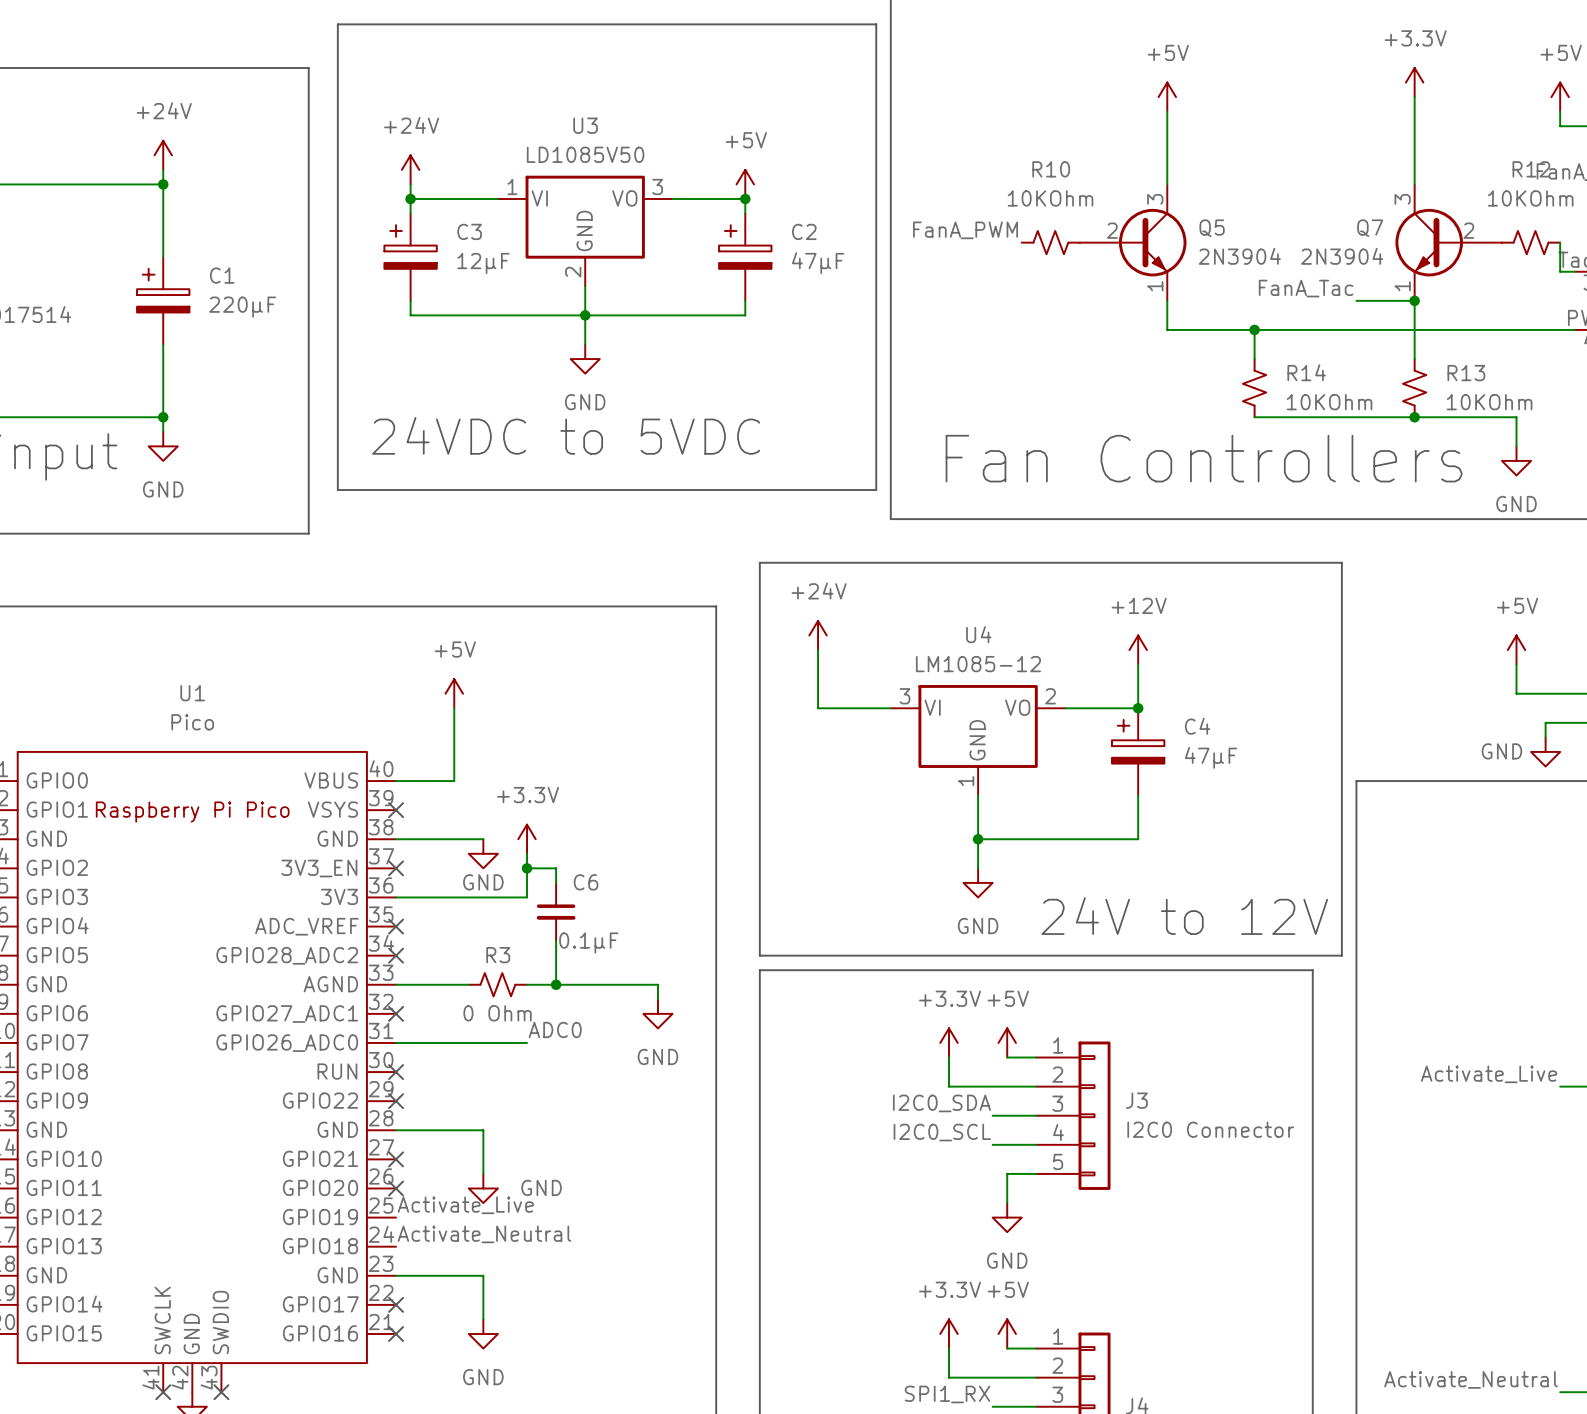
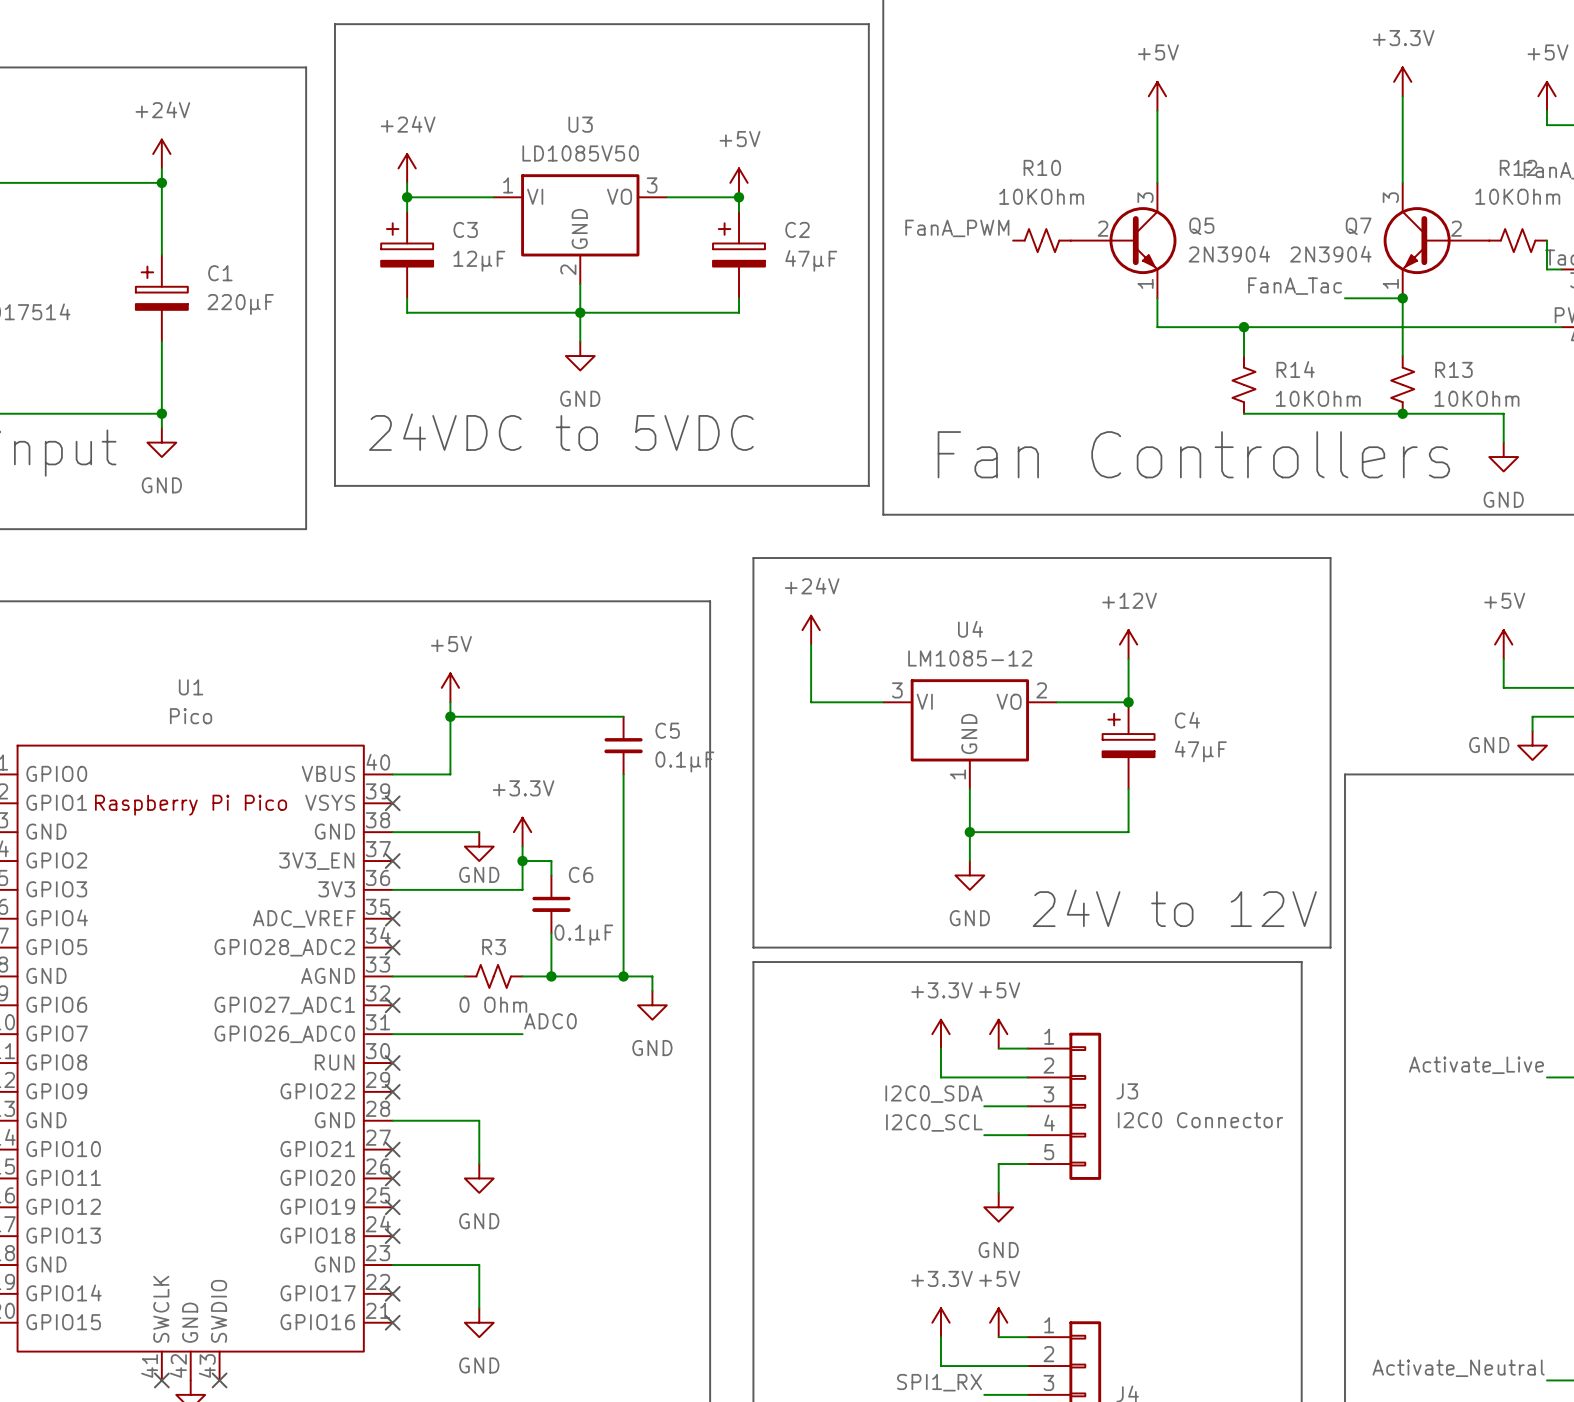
wire: none -> (450, 716) (623, 716)
junction: none -> (450, 716)
C5: none -> 0.1µF (623, 745)
wire: none -> (623, 774) (623, 976)
junction: none -> (623, 976)
power symbol text position: GND (541, 1187) -> GND (479, 1221)
label: Activate_Live (465, 1205) -> none
no-connect mark: none -> (392, 1207)
label: Activate_Neutral (484, 1234) -> none
no-connect mark: none -> (392, 1236)

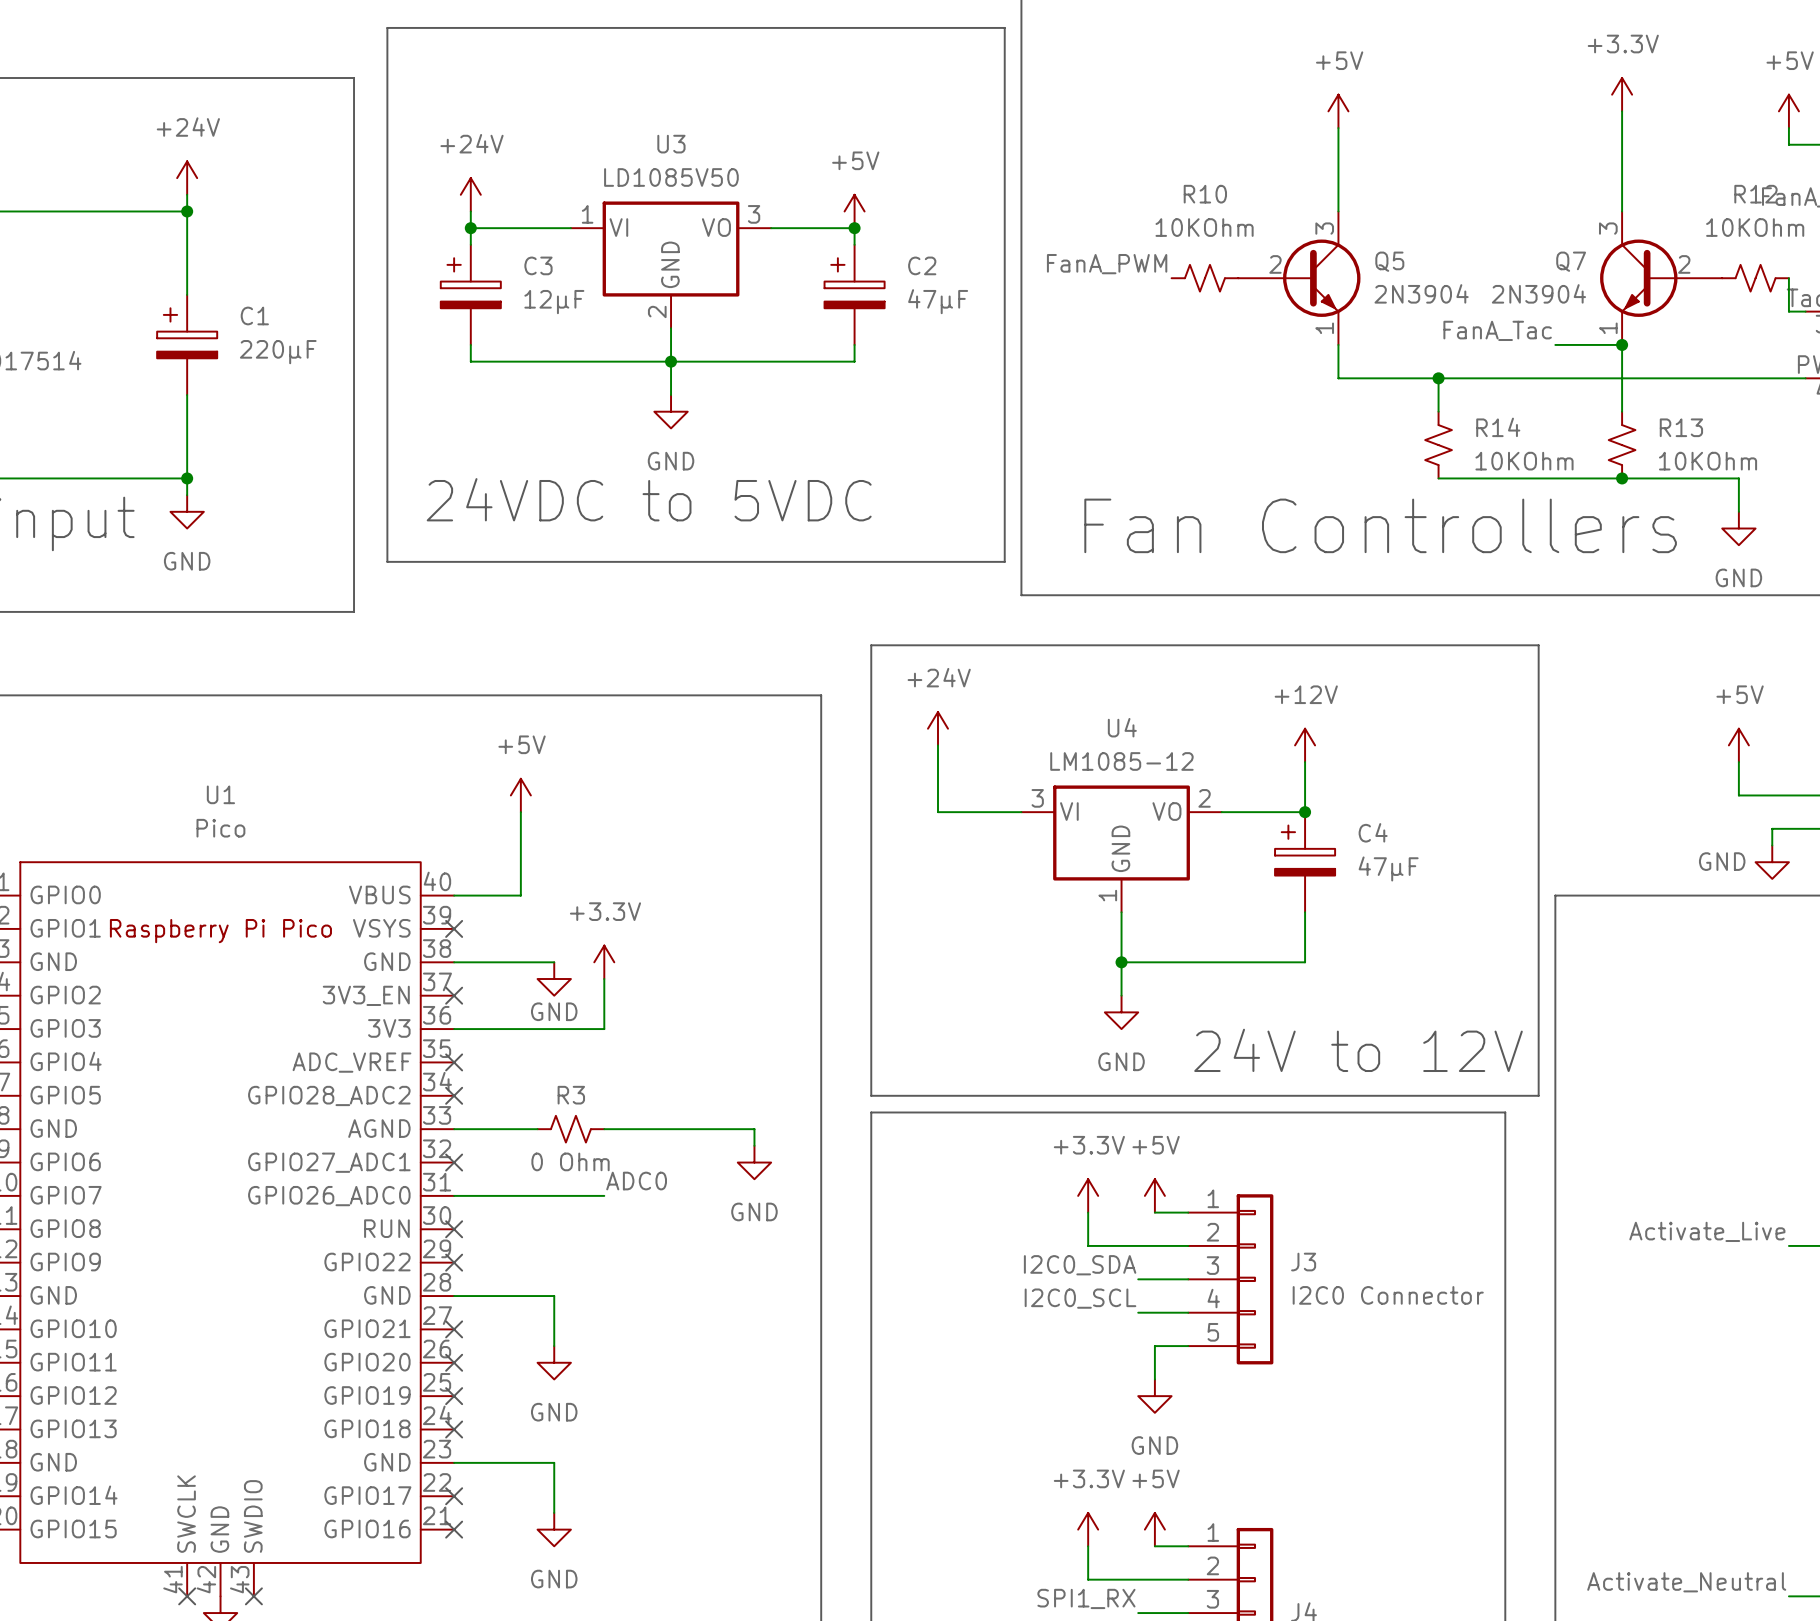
wire: (450, 716) (623, 716) -> none
junction: (450, 716) -> none
C5: 0.1µF (623, 745) -> none
wire: (623, 774) (623, 976) -> none
wire: (522, 861) (551, 861) (551, 875) -> none
junction: (522, 861) -> none
C6: 0.1µF (551, 904) -> none
wire: (551, 933) (551, 976) -> none
junction: (551, 976) -> none
junction: (623, 976) -> none

